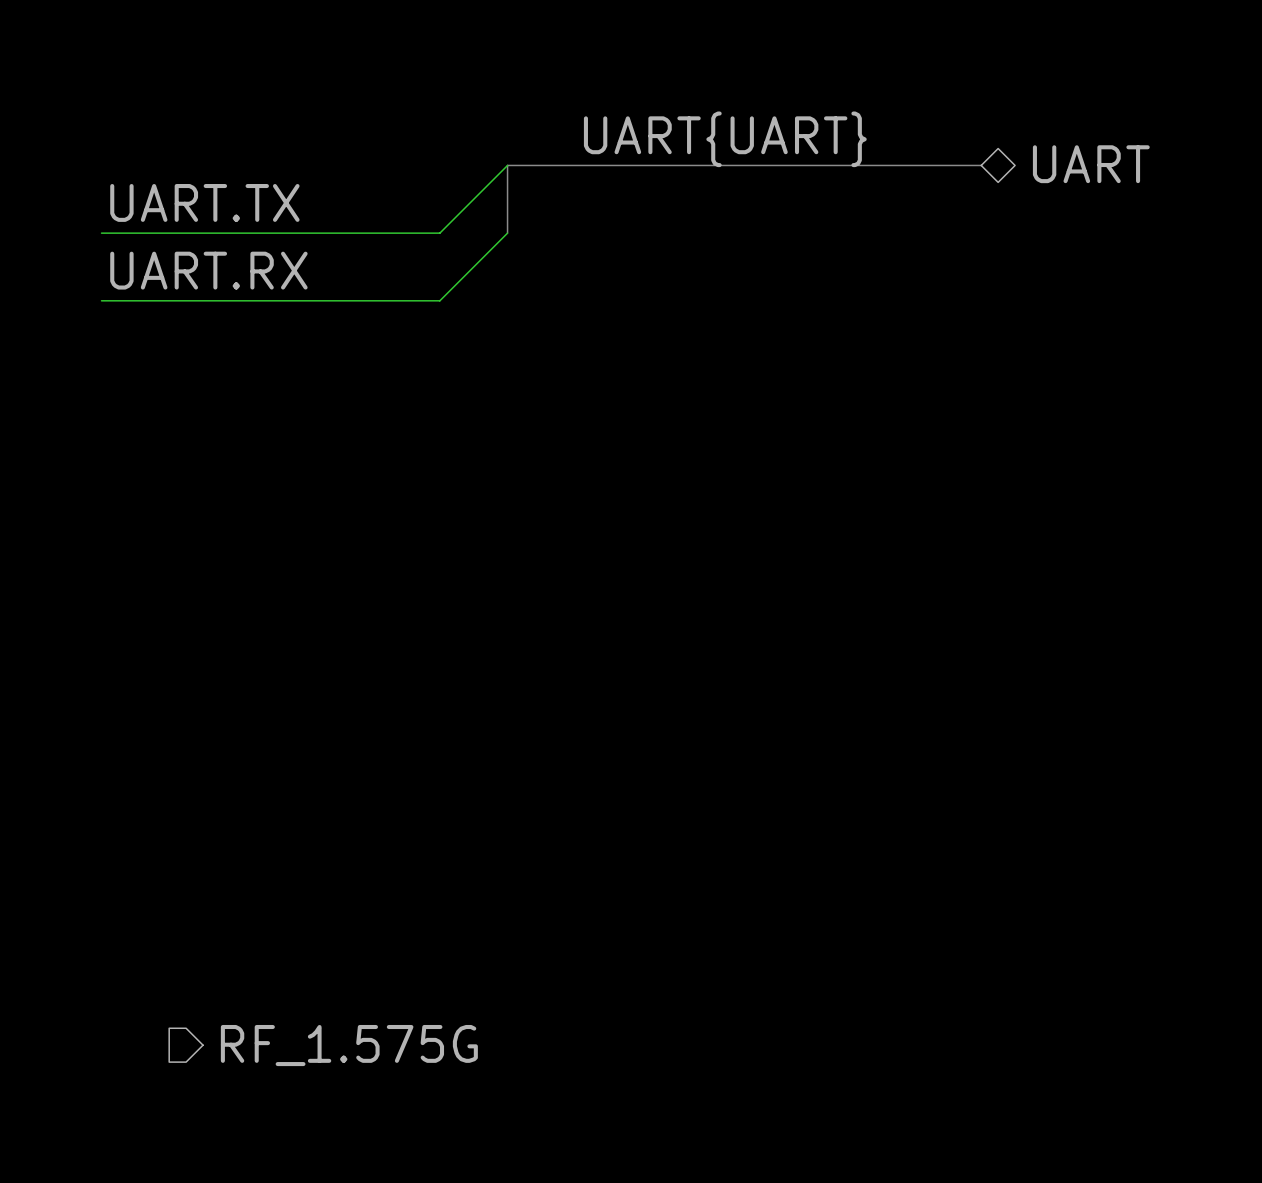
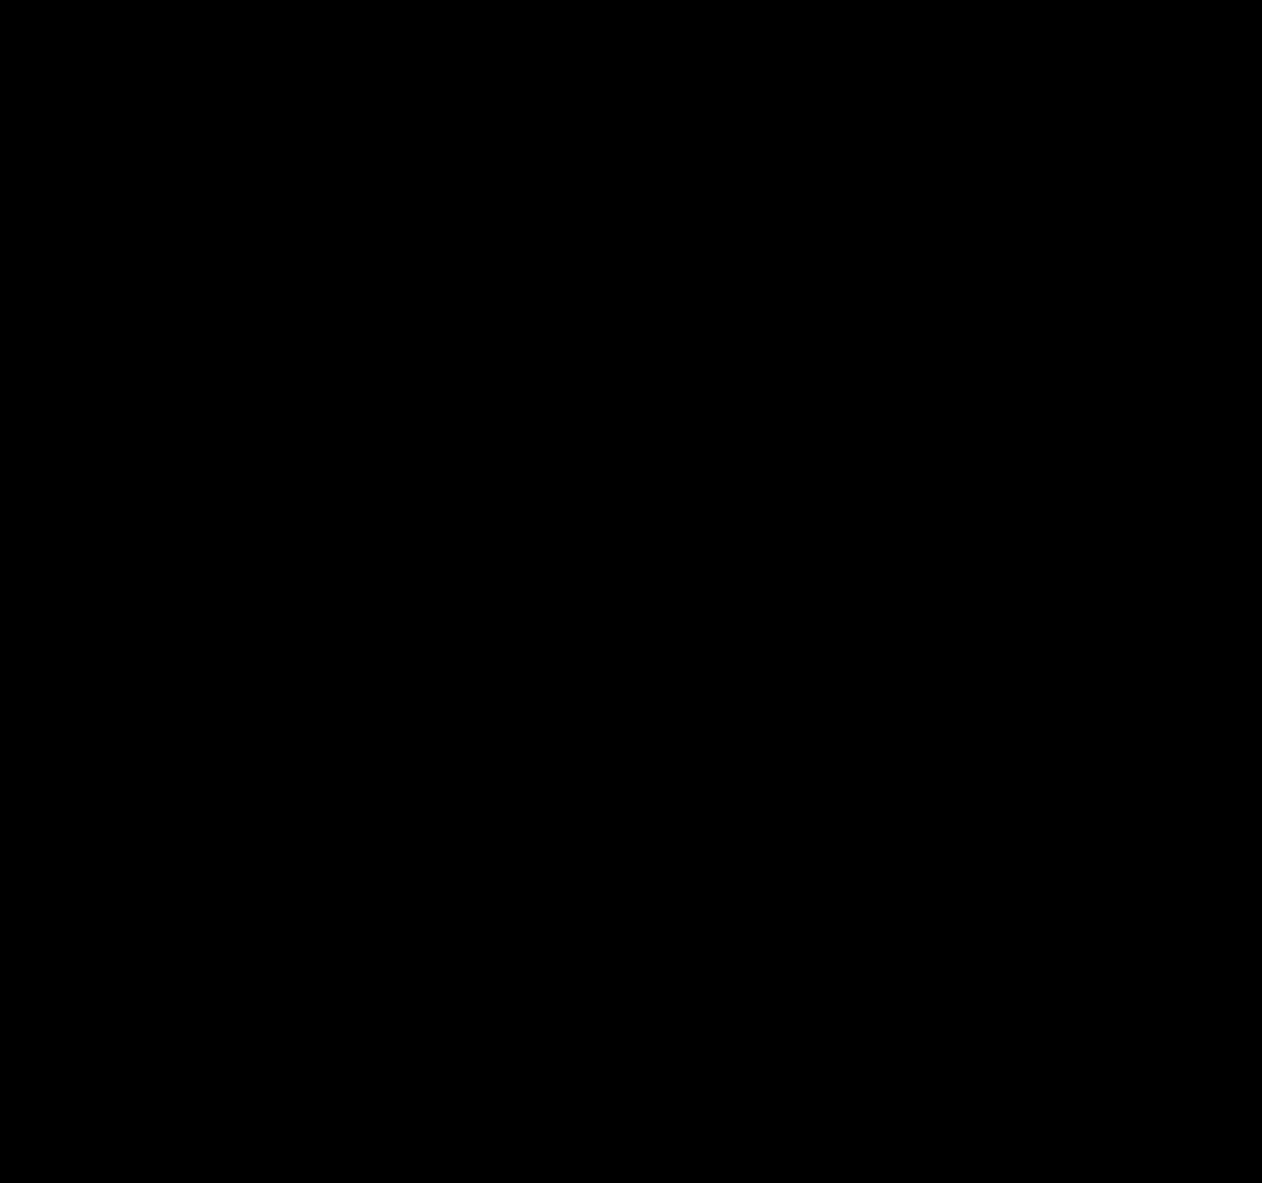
label: UART{UART} (725, 139) -> none
hierarchical label: UART (1091, 164) -> none
wire: (507, 165) (439, 233) (101, 233) -> none
bus: (981, 165) (507, 165) (507, 233) -> none
label: UART.TX (204, 202) -> none
wire: (507, 233) (439, 300) (101, 300) -> none
label: UART.RX (208, 270) -> none
hierarchical label: RF_1.575G (349, 1045) -> none

